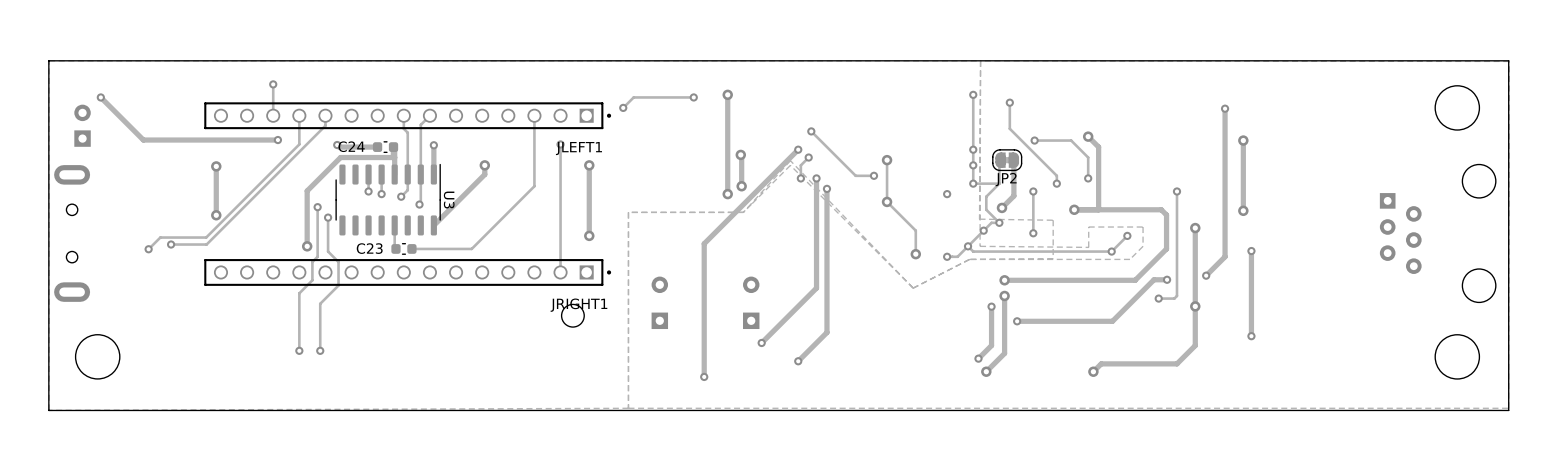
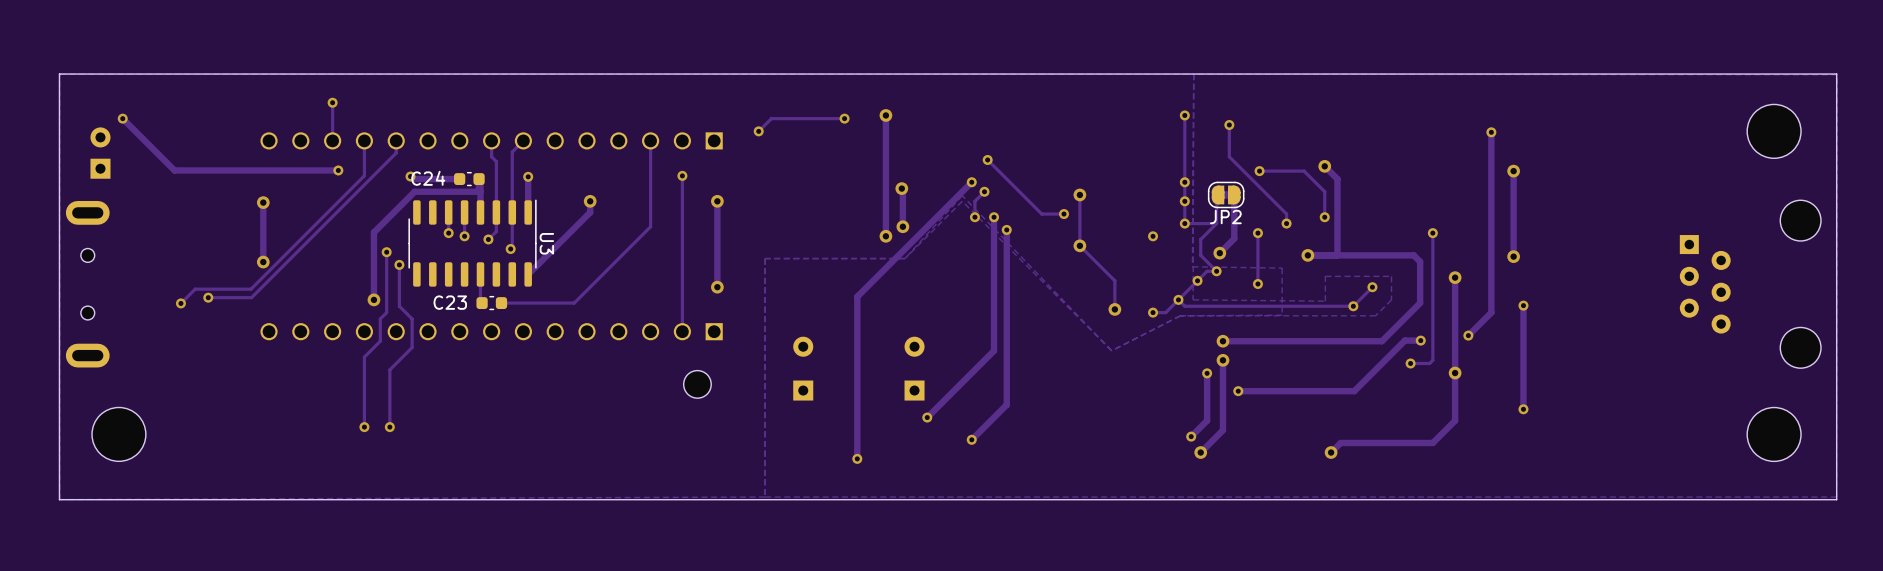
JLEFT1 side: bottom (407, 115) -> top (491, 140)
JRIGHT1 side: bottom (407, 272) -> top (491, 331)

